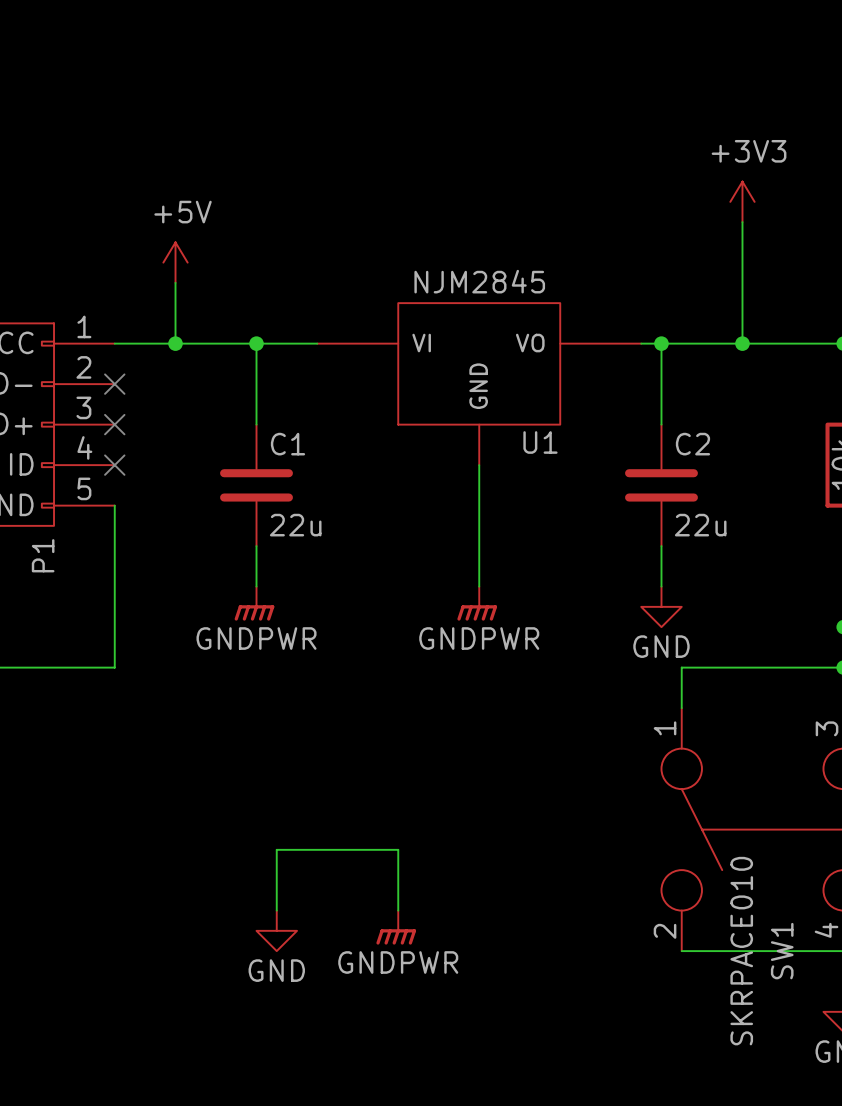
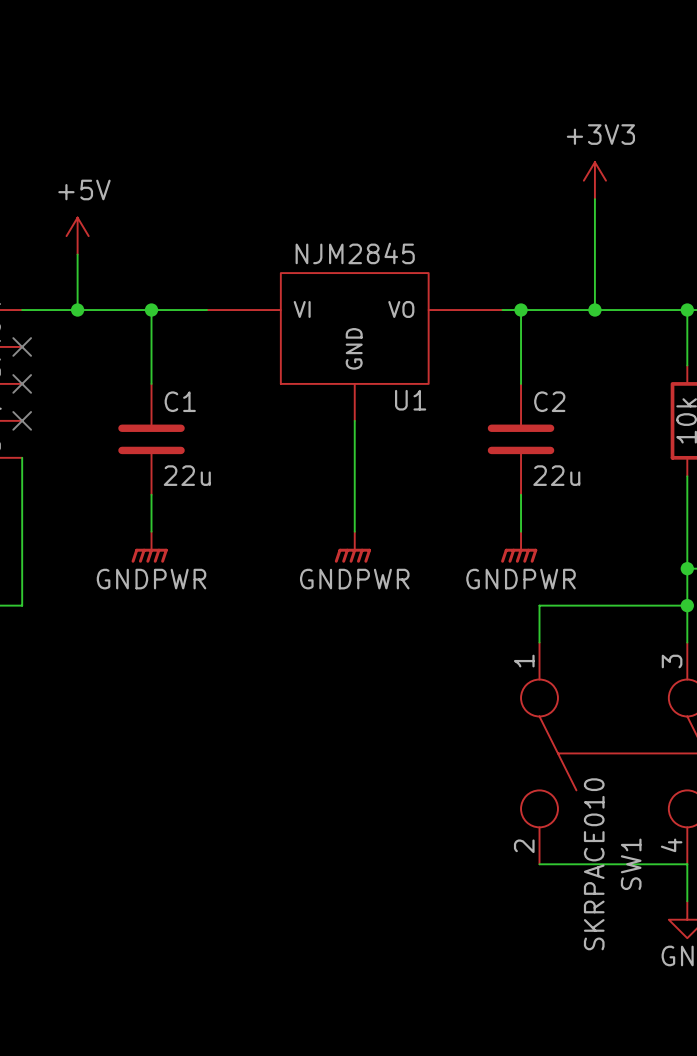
power symbol: GND (661, 606) -> GNDPWR (519, 547)
wire: (276, 910) (276, 849) (398, 849) (398, 910) -> none
power symbol: GNDPWR (396, 927) -> none
power symbol: GND (276, 930) -> none

